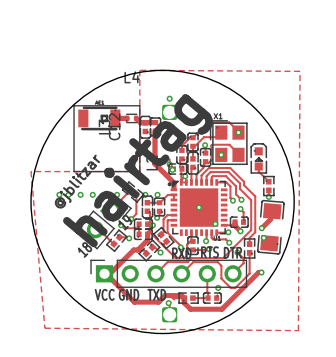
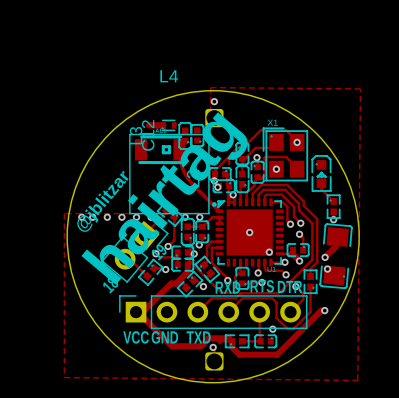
round board edge: [30, 70, 295, 334] -> none
round board edge: none -> [66, 90, 360, 384]
line: (74, 105) (139, 105) (139, 171) (74, 171) (74, 105) -> (129, 134) (208, 134) (208, 213) (129, 213) (129, 134)
part position: (99, 118) -> (160, 149)
track: (136, 118) (140, 122) (154, 122) -> none
track: (155, 131) (155, 163) (173, 182) (173, 187) -> none
track: none -> (237, 148) (215, 170) (215, 174)
track: none -> (179, 151) (181, 165) (187, 178) (219, 211)
part rotation: 0° (181, 154) -> 90° counterclockwise (220, 174)
zone outline: (44, 328) (31, 171) (139, 171) (139, 70) (300, 71) (298, 330) (288, 330) -> (64, 377) (64, 213) (209, 213) (210, 87) (360, 88) (357, 380)

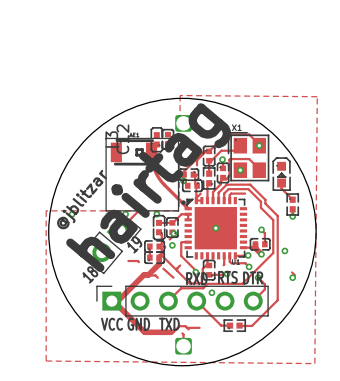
via: (214, 101) -> none
track: (149, 125) (163, 125) -> none
L4: (168, 125) -> none
part: none -> (209, 178)
part: (242, 179) -> none
via: (217, 187) -> none
via: (233, 194) -> none
track: (281, 194) (294, 206) (294, 216) (300, 223) -> none
track: (270, 202) (282, 202) (287, 207) (287, 221) (290, 224) -> none
part: (170, 213) -> none
via: (81, 217) -> none
via: (107, 217) -> none
via: (121, 217) -> none
track: (174, 217) (174, 240) (168, 246) -> none
via: (199, 217) -> none
via: (300, 223) -> none
via: (290, 224) -> none
via: none -> (173, 233)
track: (219, 241) (211, 241) (207, 246) (207, 262) (204, 265) -> none
via: (199, 244) -> none
track: (336, 245) (325, 257) -> none
via: (168, 246) -> none
via: none -> (172, 245)
via: (269, 252) -> none
track: (155, 253) (159, 257) (177, 257) -> none
via: (155, 253) -> none
via: (194, 253) -> none
part: (336, 256) -> none
track: (129, 259) (146, 276) -> none
track: (317, 262) (310, 269) (310, 276) -> (277, 255) (277, 300) (251, 325) (239, 325)
via: (165, 269) -> none
part: (207, 269) -> none
via: (327, 269) -> none
part: (150, 272) -> none
via: (258, 272) -> none
part: (310, 281) -> none
part: (190, 284) -> none
via: (203, 286) -> none
track: (310, 286) (310, 311) (293, 329) (287, 329) (276, 317) (276, 302) (272, 298) (242, 298) (228, 312) -> (229, 325) (221, 325) (196, 301)
via: none -> (292, 277)
via: none -> (211, 292)
track: (324, 310) (321, 310) (277, 354) (239, 354) (231, 347) (231, 341) (228, 338) (208, 338) (201, 346) -> none
via: (324, 310) -> none
track: (259, 312) (260, 341) (242, 341) -> none
via: (272, 329) -> none
part footprint: [254, 334, 278, 349] -> [223, 319, 247, 333]
part: (237, 341) -> none
via: (213, 347) -> none

